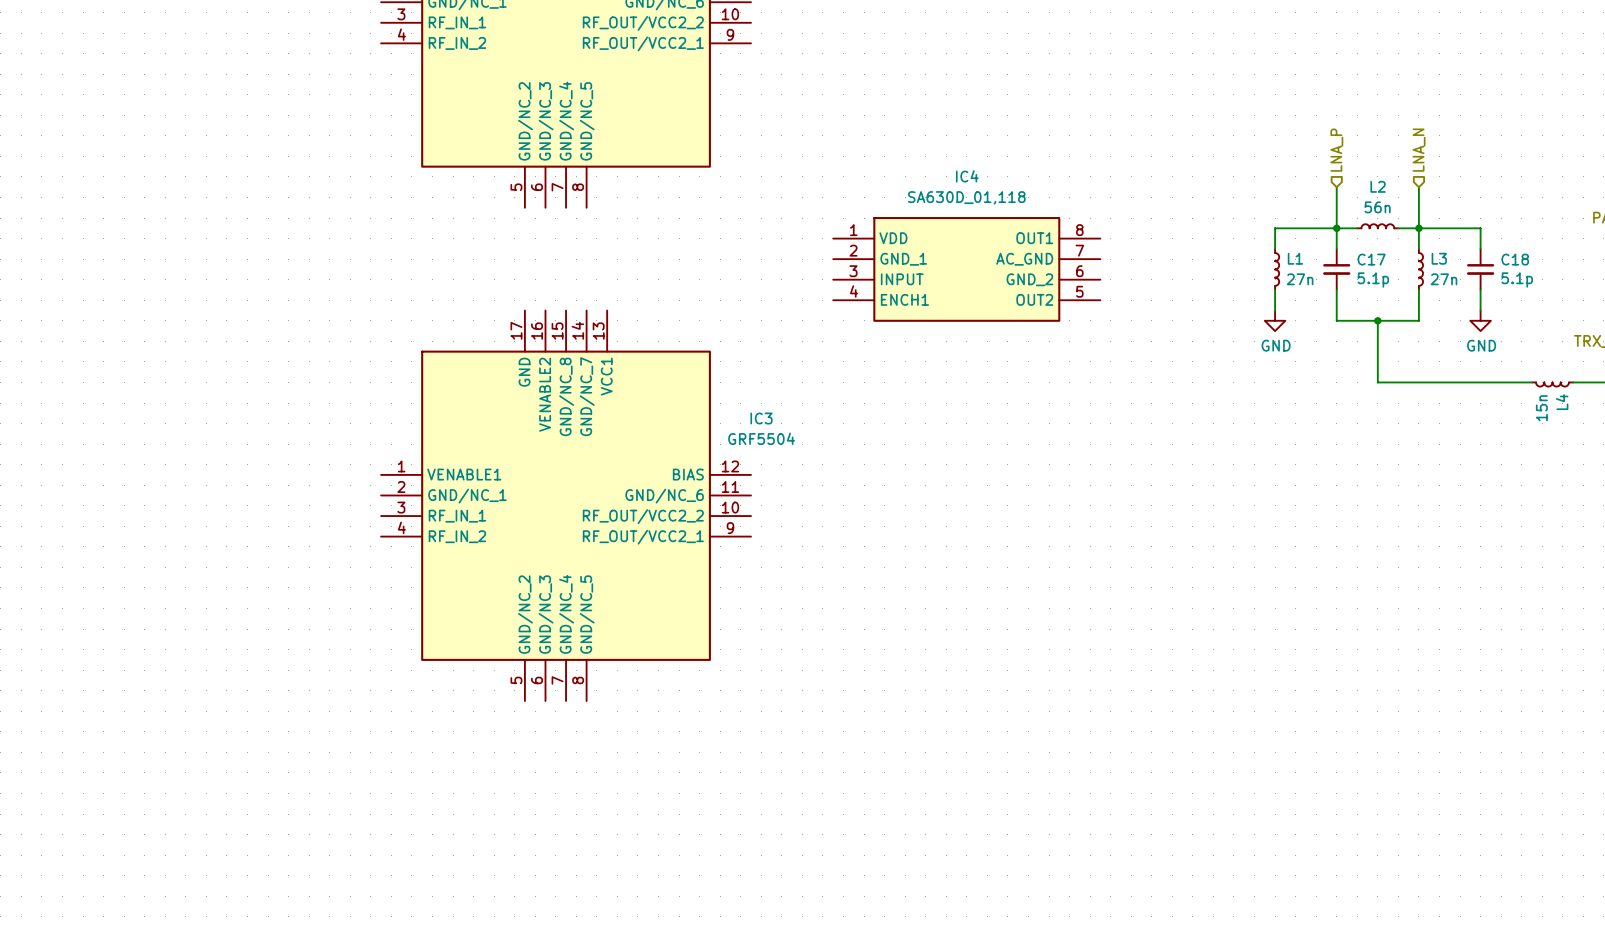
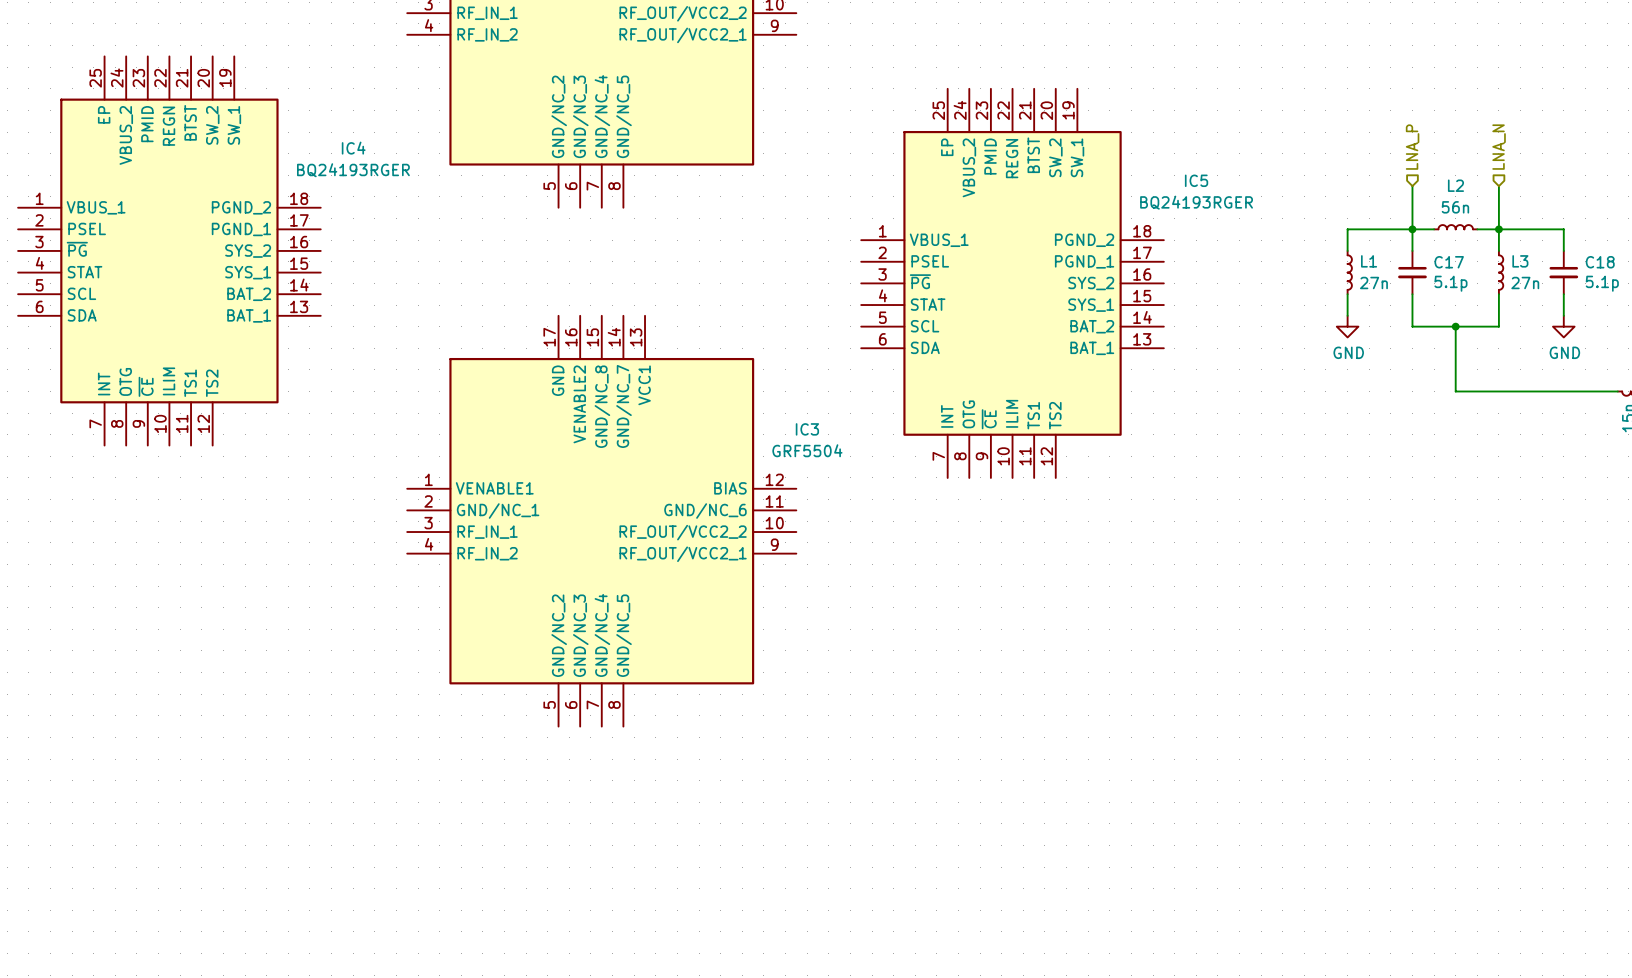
IC4 name position: IC4 (967, 176) -> IC4 (353, 148)
IC4 value: SA630D_01,118 (966, 197) -> BQ24193RGER (353, 170)
IC4 symbol: [833, 217, 1101, 322] -> [18, 56, 321, 446]
IC5: none -> BQ24193RGER (1012, 283)

